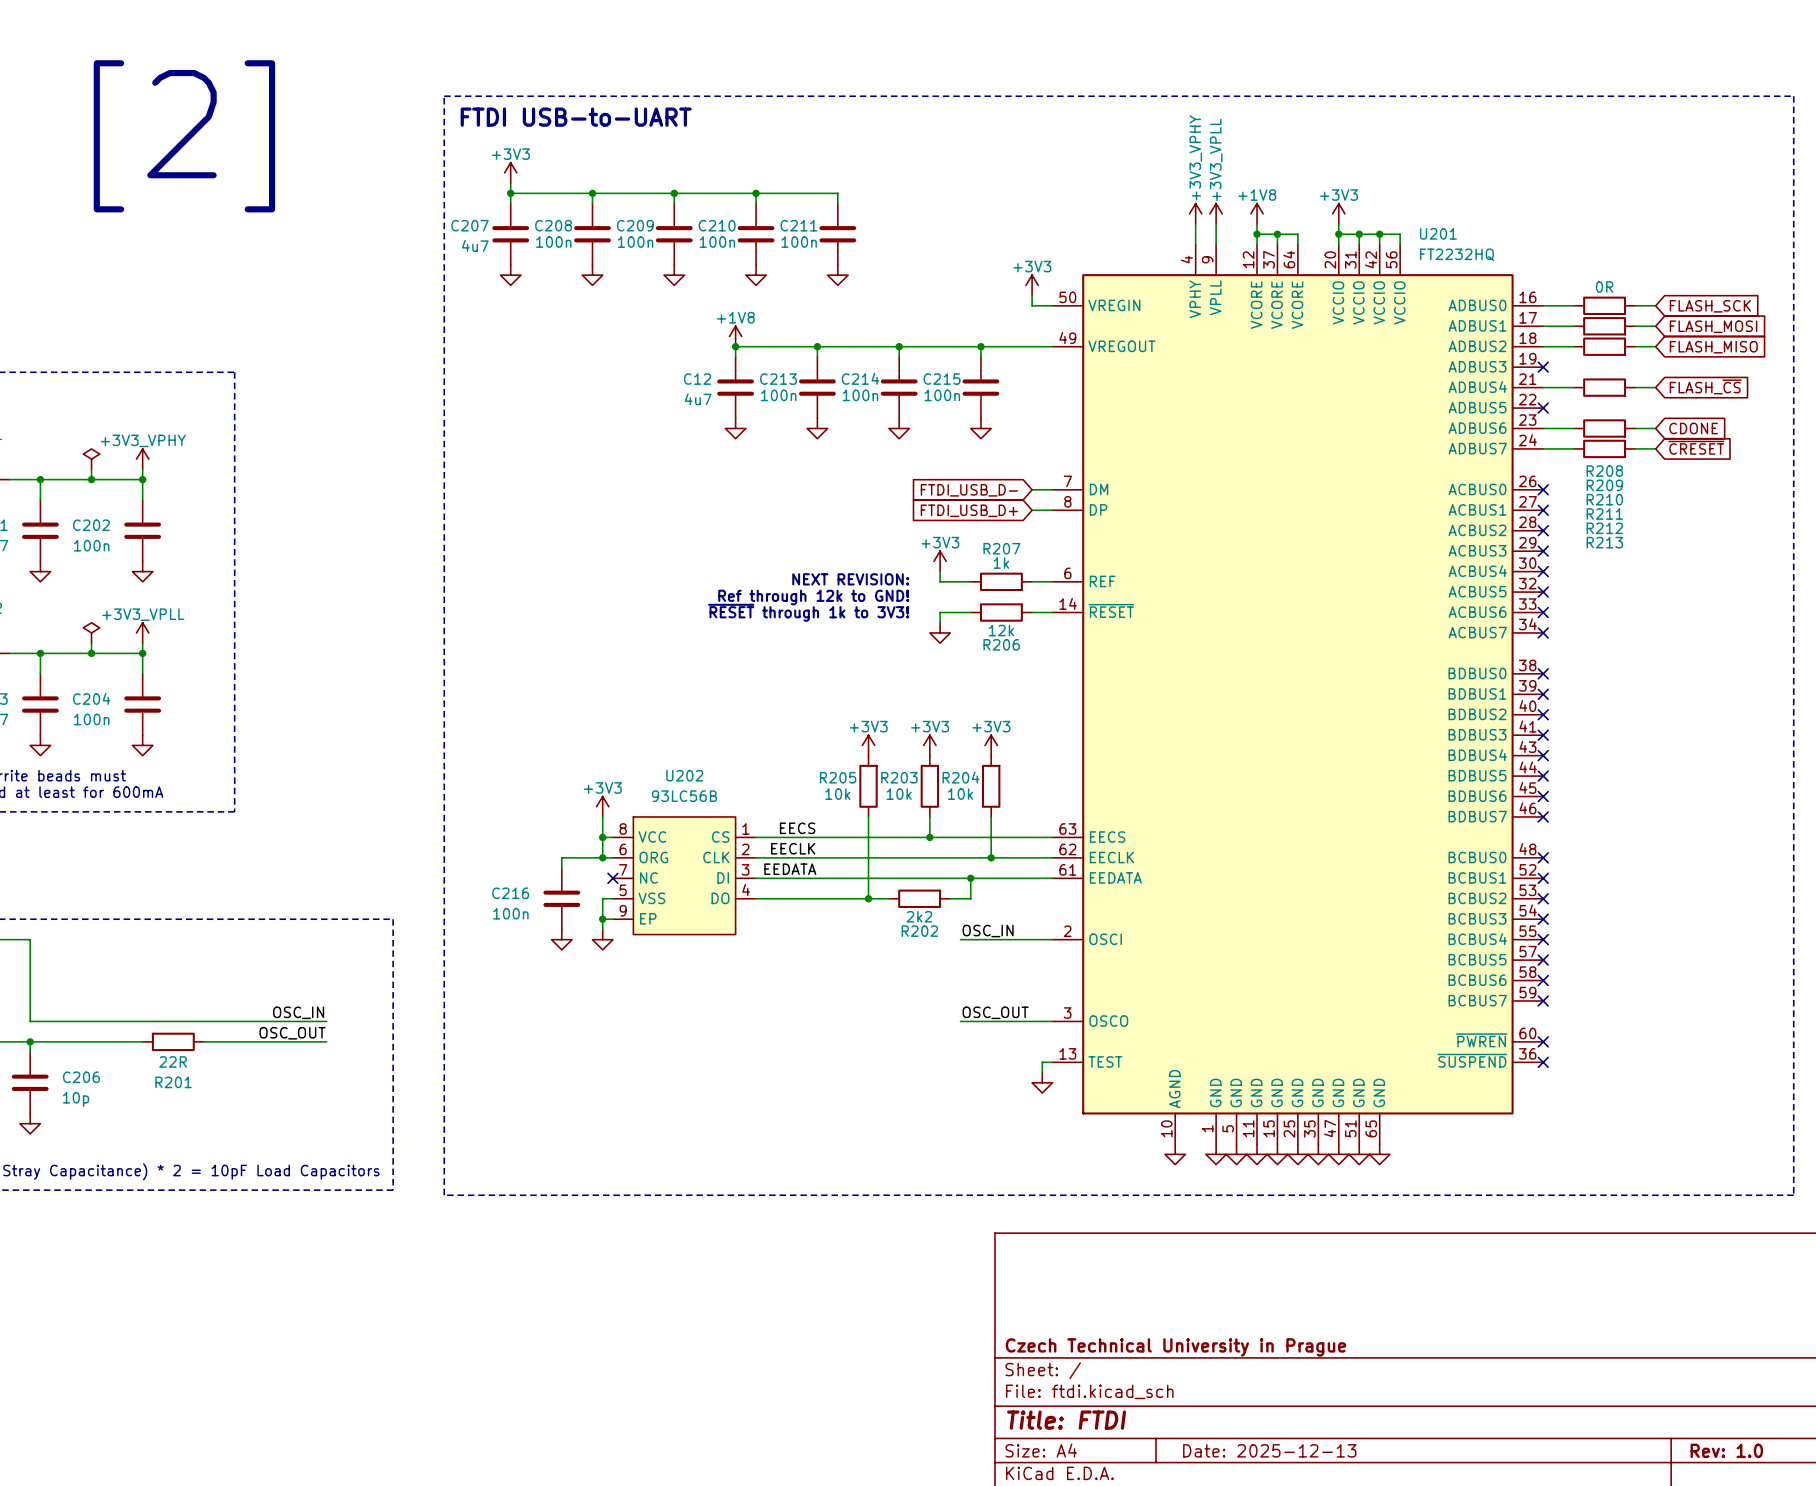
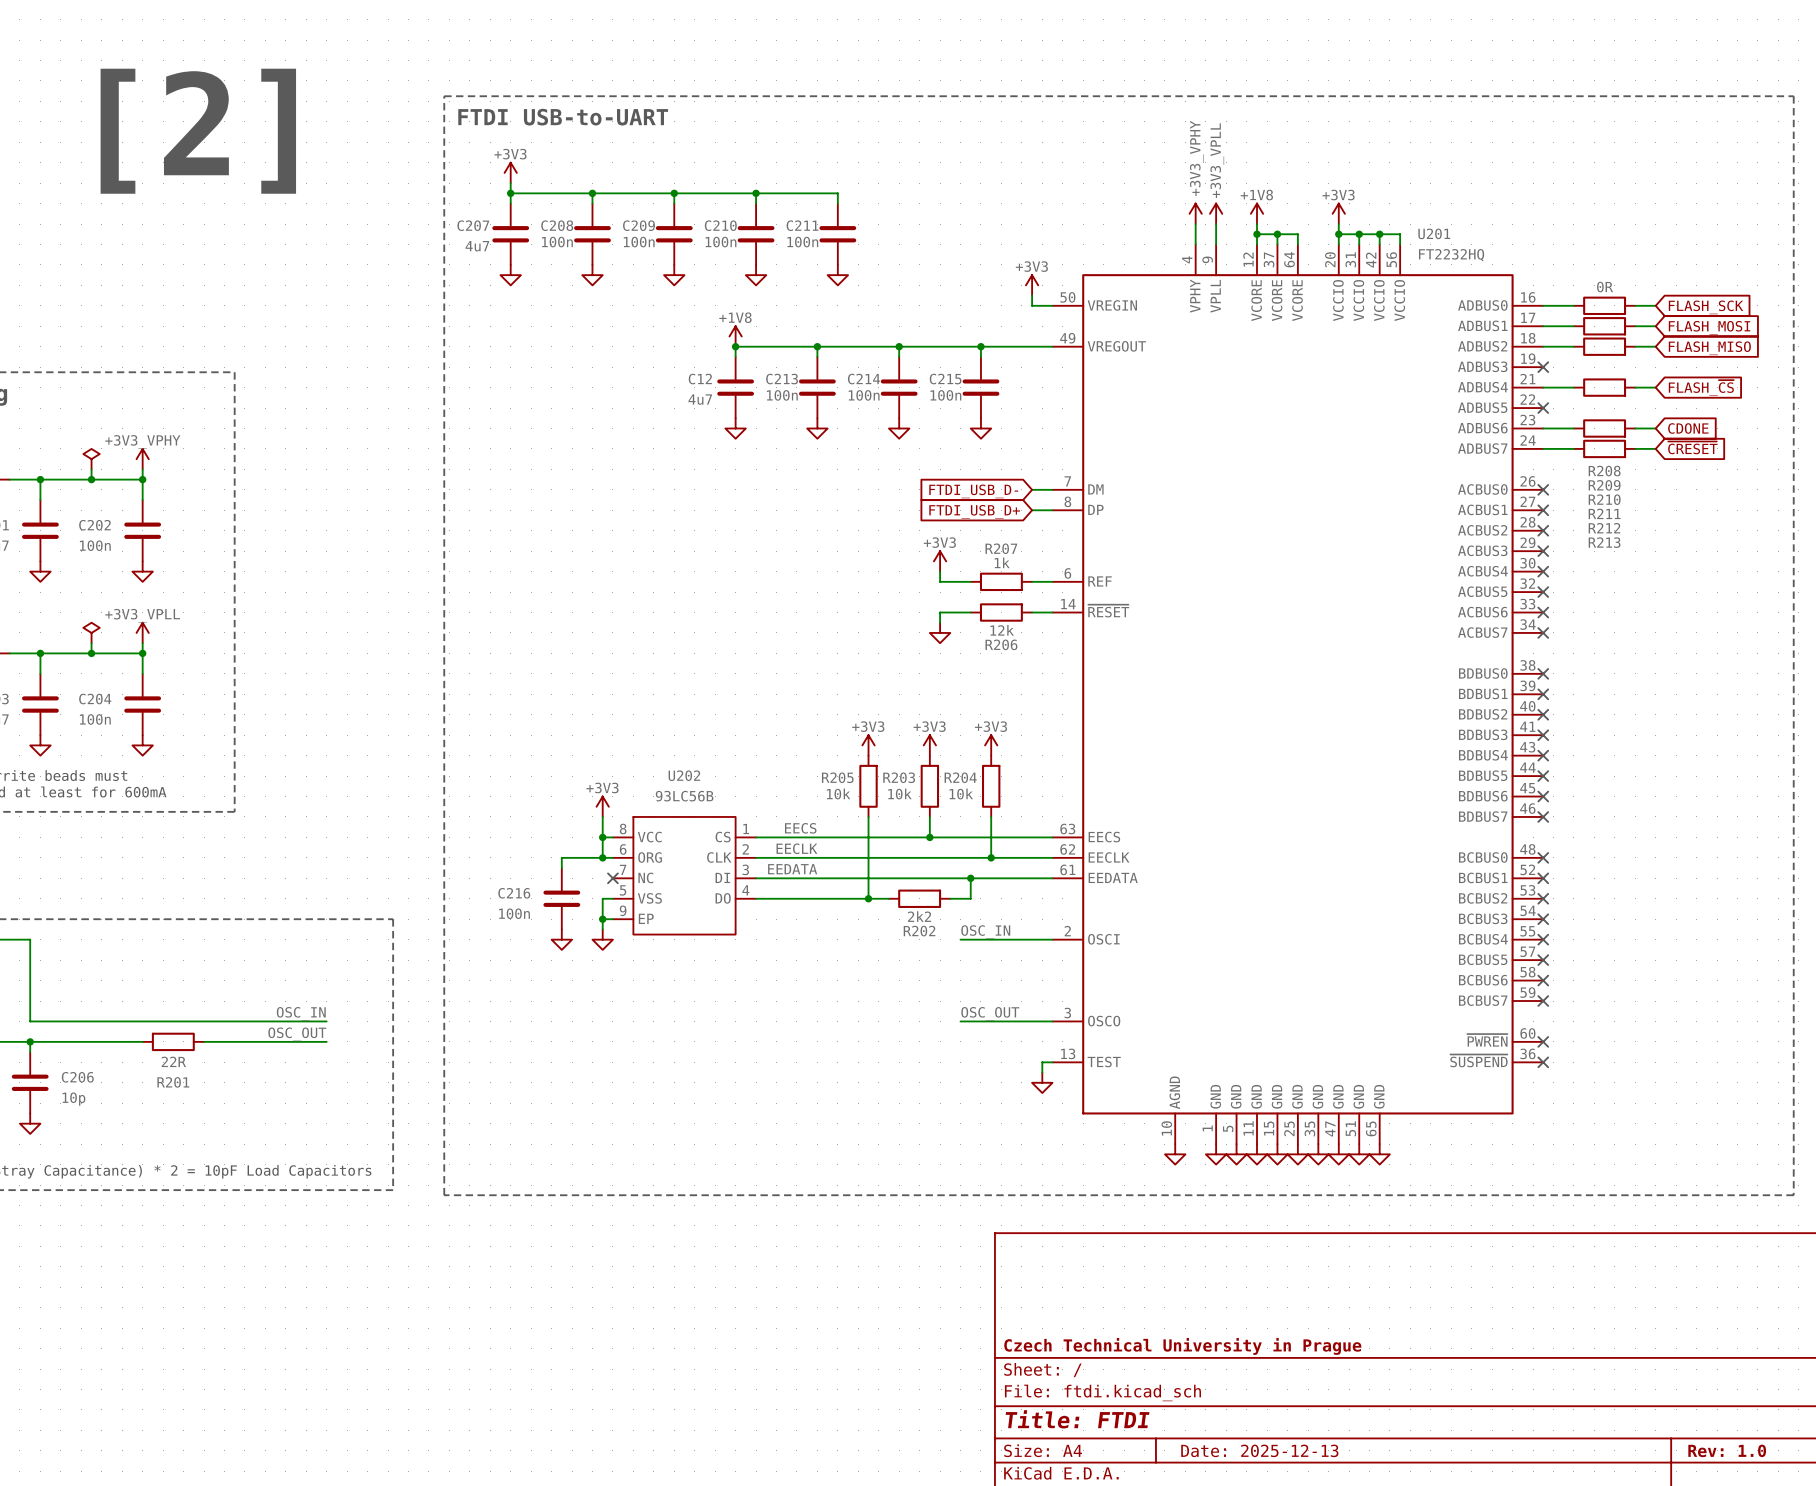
text: NEXT REVISION: (850, 579) -> none
text: Ref through 12k to GND! (813, 597) -> none
text: ~{RESET} through 1k to 3V3! (808, 612) -> none

